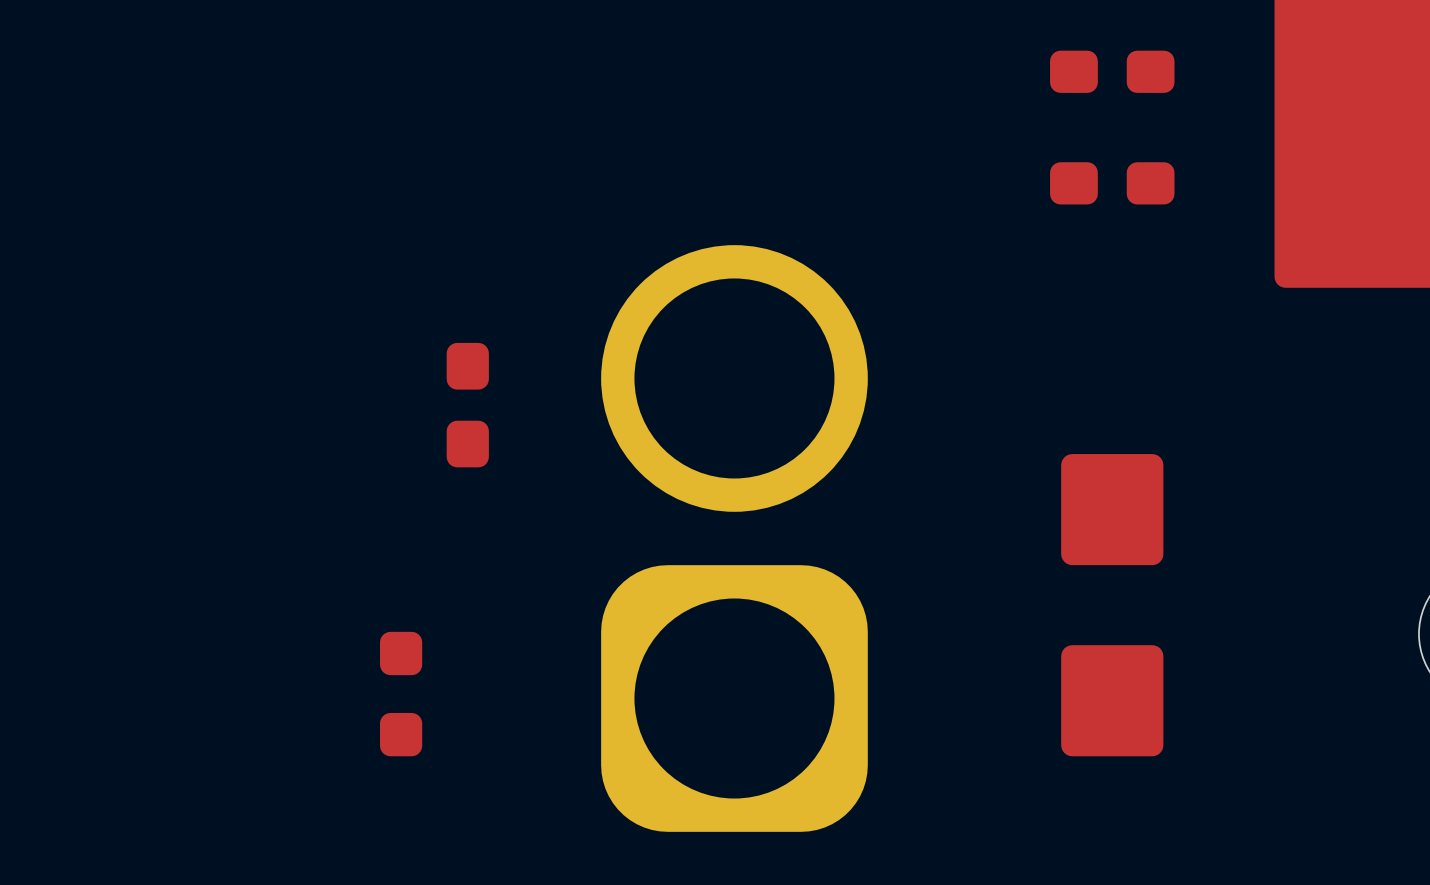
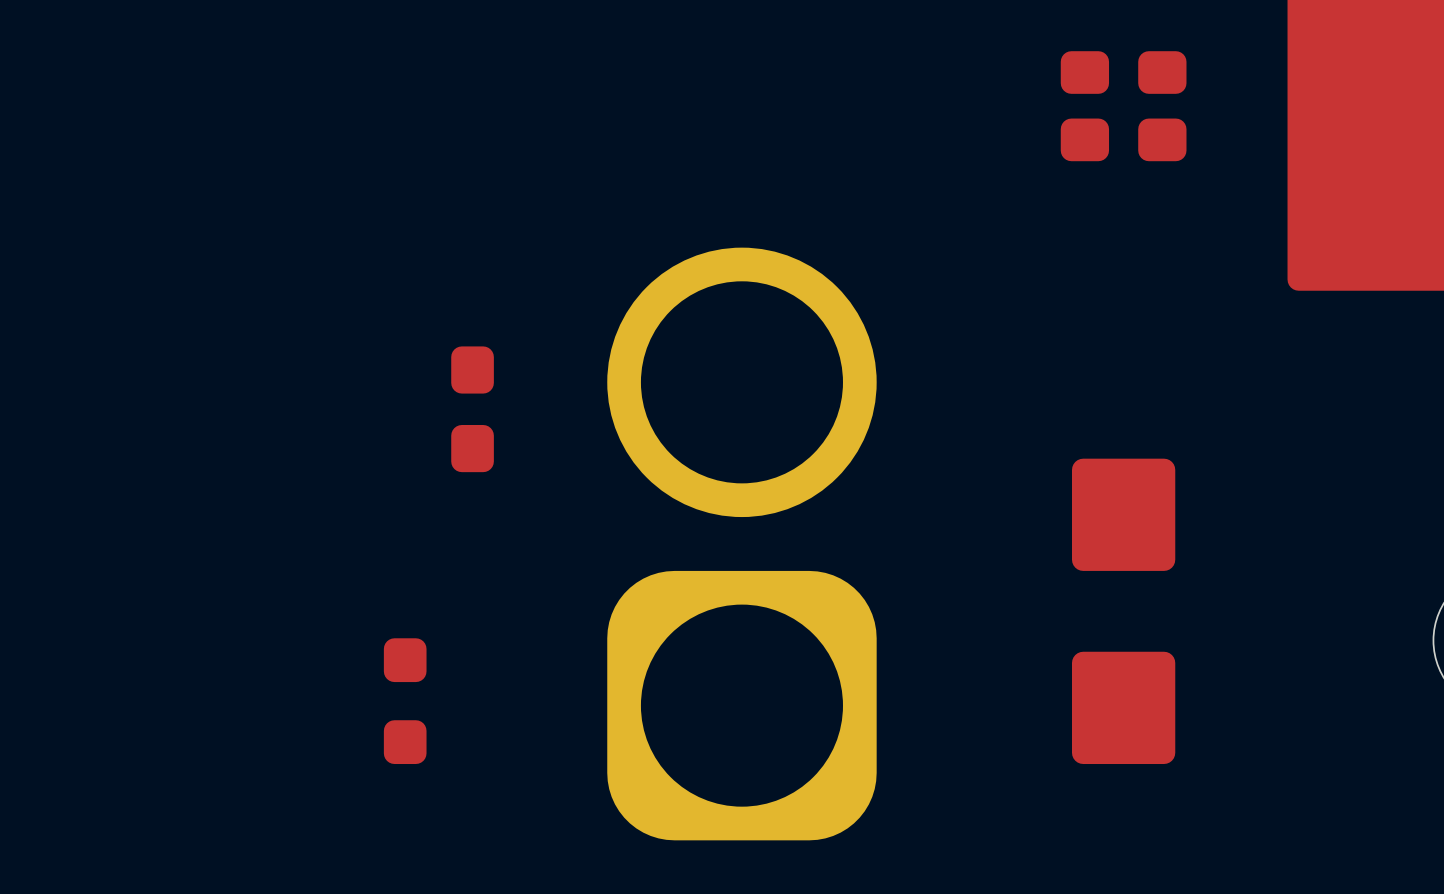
part position: (1112, 183) -> (1123, 139)

